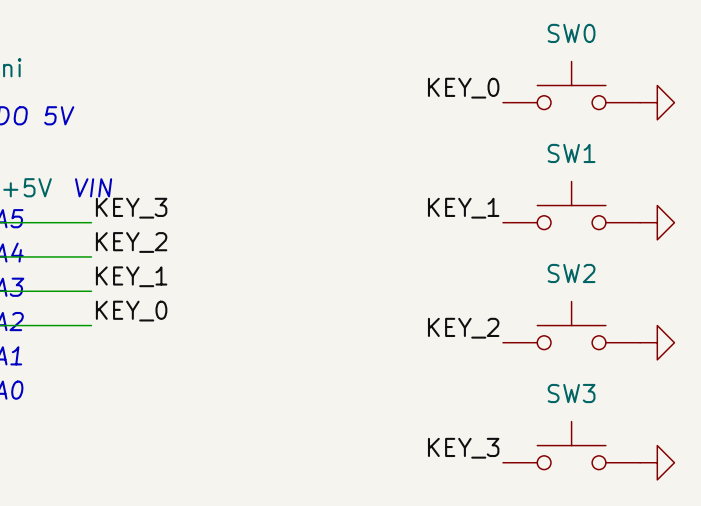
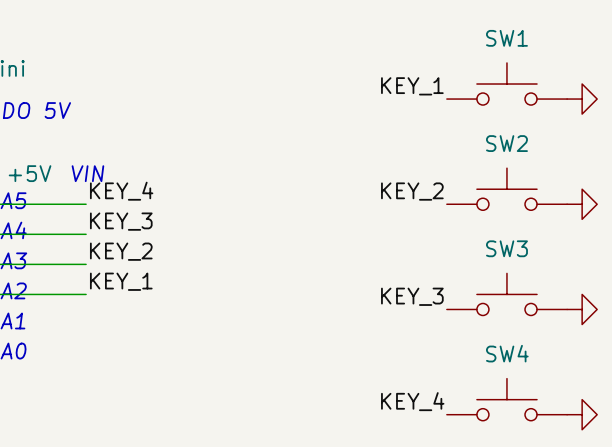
SW0 name: SW0 (571, 33) -> SW1 (506, 38)
label: KEY_0 (463, 88) -> KEY_1 (412, 86)
SW1 name: SW1 (571, 153) -> SW2 (506, 143)
label: KEY_3 (131, 208) -> KEY_4 (121, 191)
label: KEY_1 (463, 208) -> KEY_2 (412, 191)
label: KEY_2 (131, 242) -> KEY_3 (121, 221)
SW2 name: SW2 (571, 273) -> SW3 (506, 248)
label: KEY_1 (131, 276) -> KEY_2 (121, 251)
label: KEY_0 (131, 311) -> KEY_1 (121, 281)
label: KEY_2 (463, 328) -> KEY_3 (412, 296)
SW3 name: SW3 (571, 393) -> SW4 (507, 353)
label: KEY_3 (463, 448) -> KEY_4 (412, 401)

